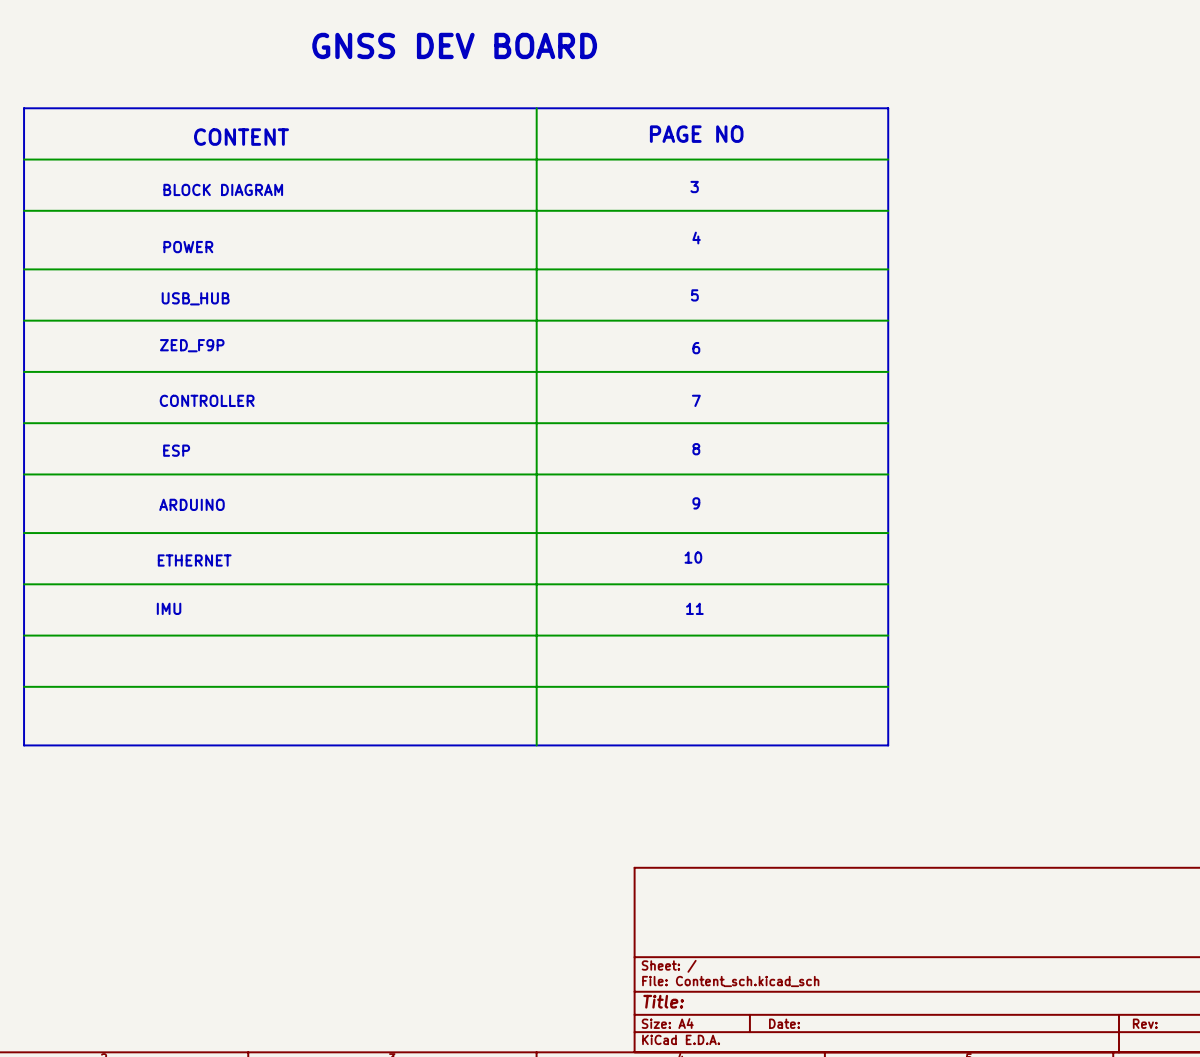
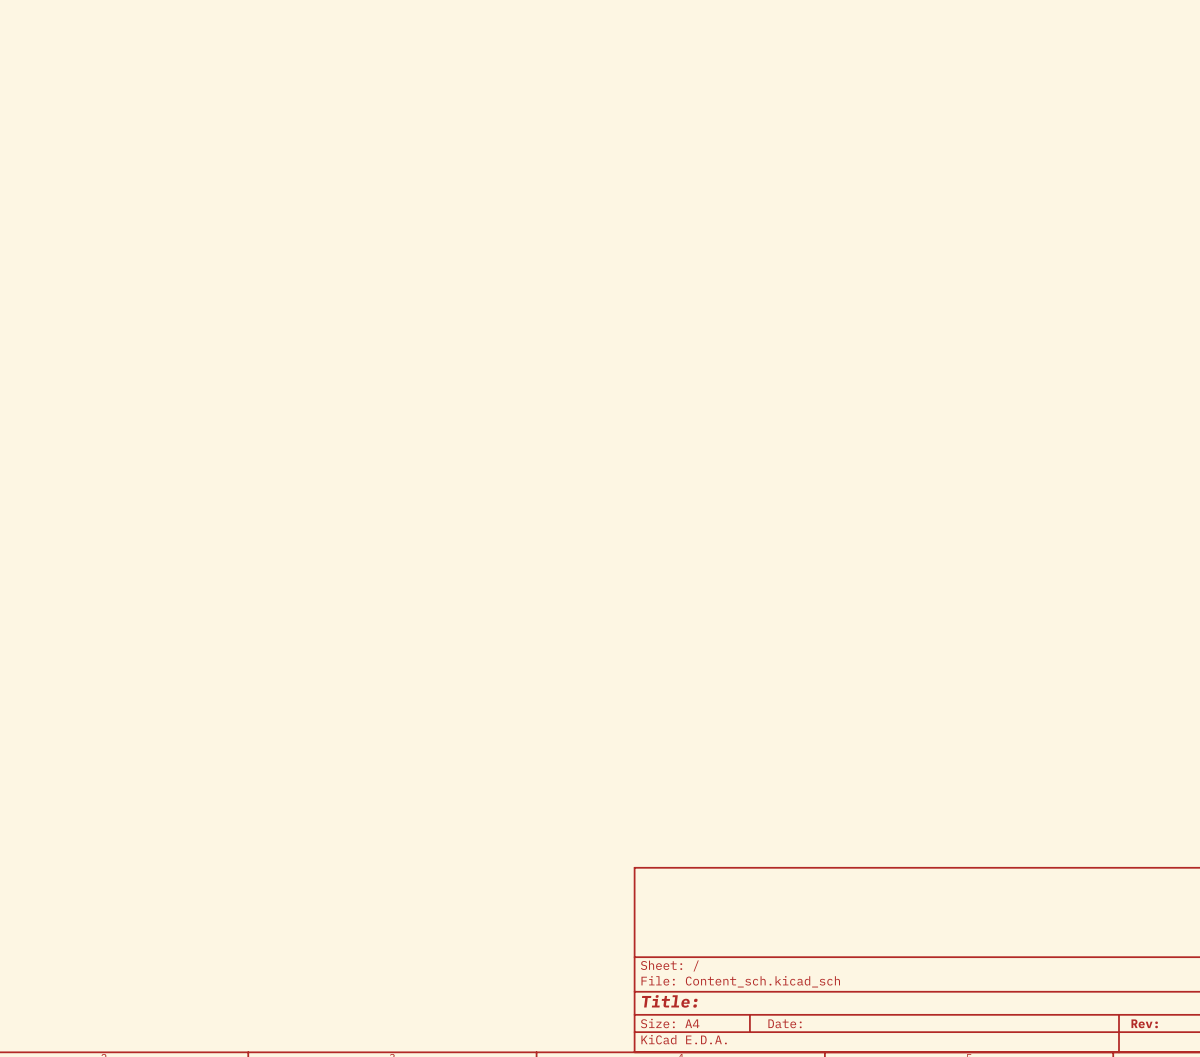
text: GNSS DEV BOARD (454, 45) -> none
line: (24, 108) (888, 108) (888, 745) (24, 745) (24, 108) -> none
wire: (536, 108) (536, 745) -> none
text: PAGE NO (696, 134) -> none
text: CONTENT (241, 137) -> none
wire: (24, 159) (888, 159) -> none
text: 3 (694, 187) -> none
text: BLOCK DIAGRAM (223, 189) -> none
wire: (24, 210) (888, 210) -> none
text: 4 (696, 238) -> none
text: POWER (188, 247) -> none
wire: (24, 269) (888, 269) -> none
text: 5 (694, 295) -> none
text: USB_HUB (195, 298) -> none
wire: (24, 320) (888, 320) -> none
text: ZED_F9P (192, 345) -> none
text: 6 (696, 348) -> none
wire: (24, 371) (888, 371) -> none
text: CONTROLLER (207, 400) -> none
text: 7 (696, 400) -> none
wire: (24, 423) (888, 423) -> none
text: 8 (696, 449) -> none
text: ESP (176, 450) -> none
wire: (24, 474) (888, 474) -> none
text: 9 (696, 503) -> none
text: ARDUINO (192, 504) -> none
wire: (24, 533) (888, 533) -> none
text: 10 (693, 557) -> none
text: ETHERNET (194, 560) -> none
wire: (24, 584) (888, 584) -> none
text: IMU (169, 608) -> none
text: 11 (694, 608) -> none
wire: (24, 635) (888, 635) -> none
wire: (24, 686) (888, 686) -> none

